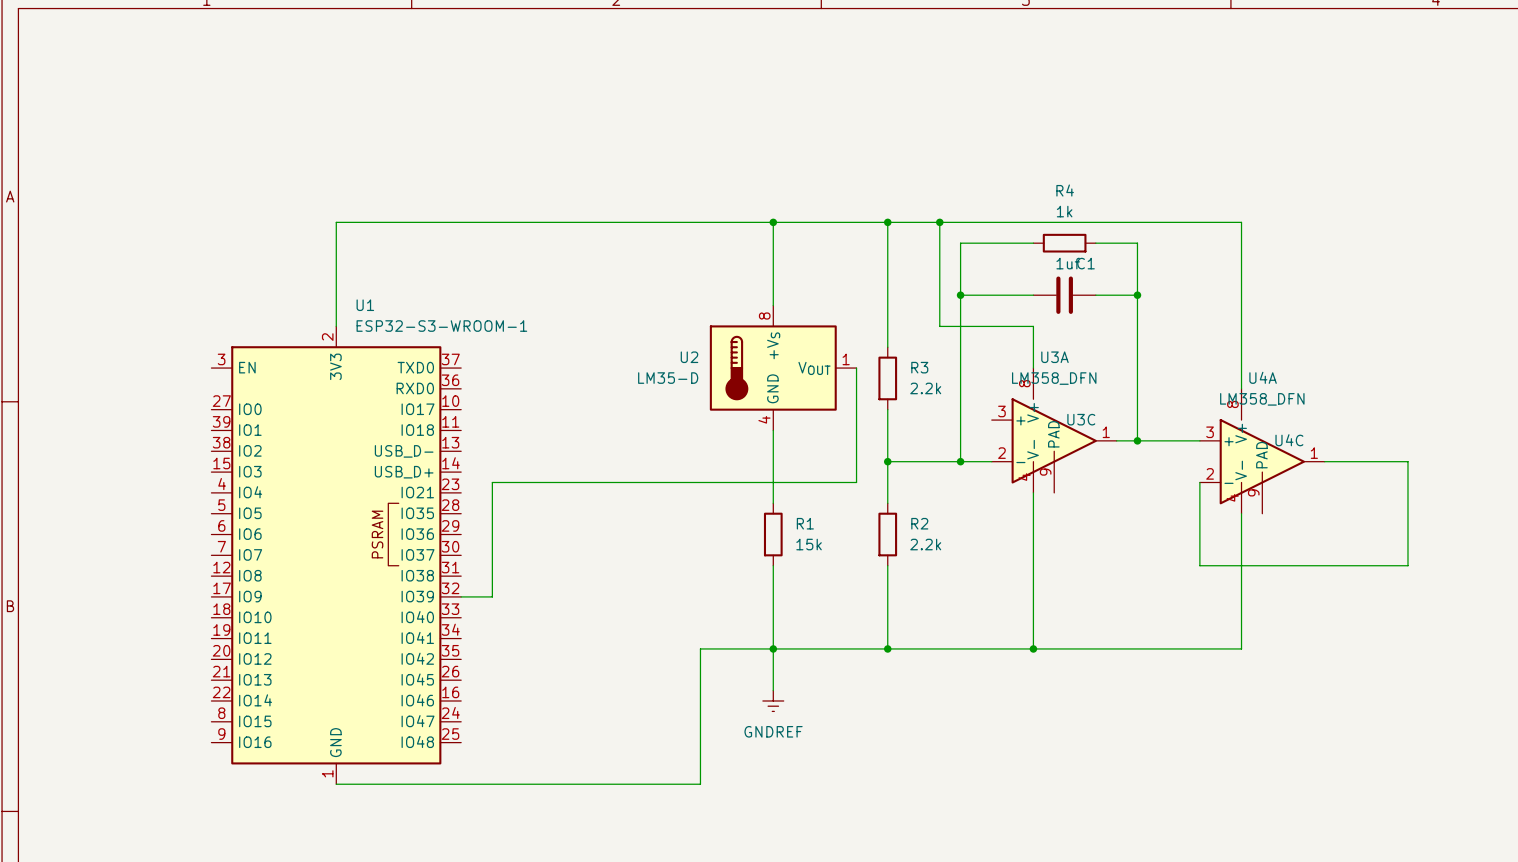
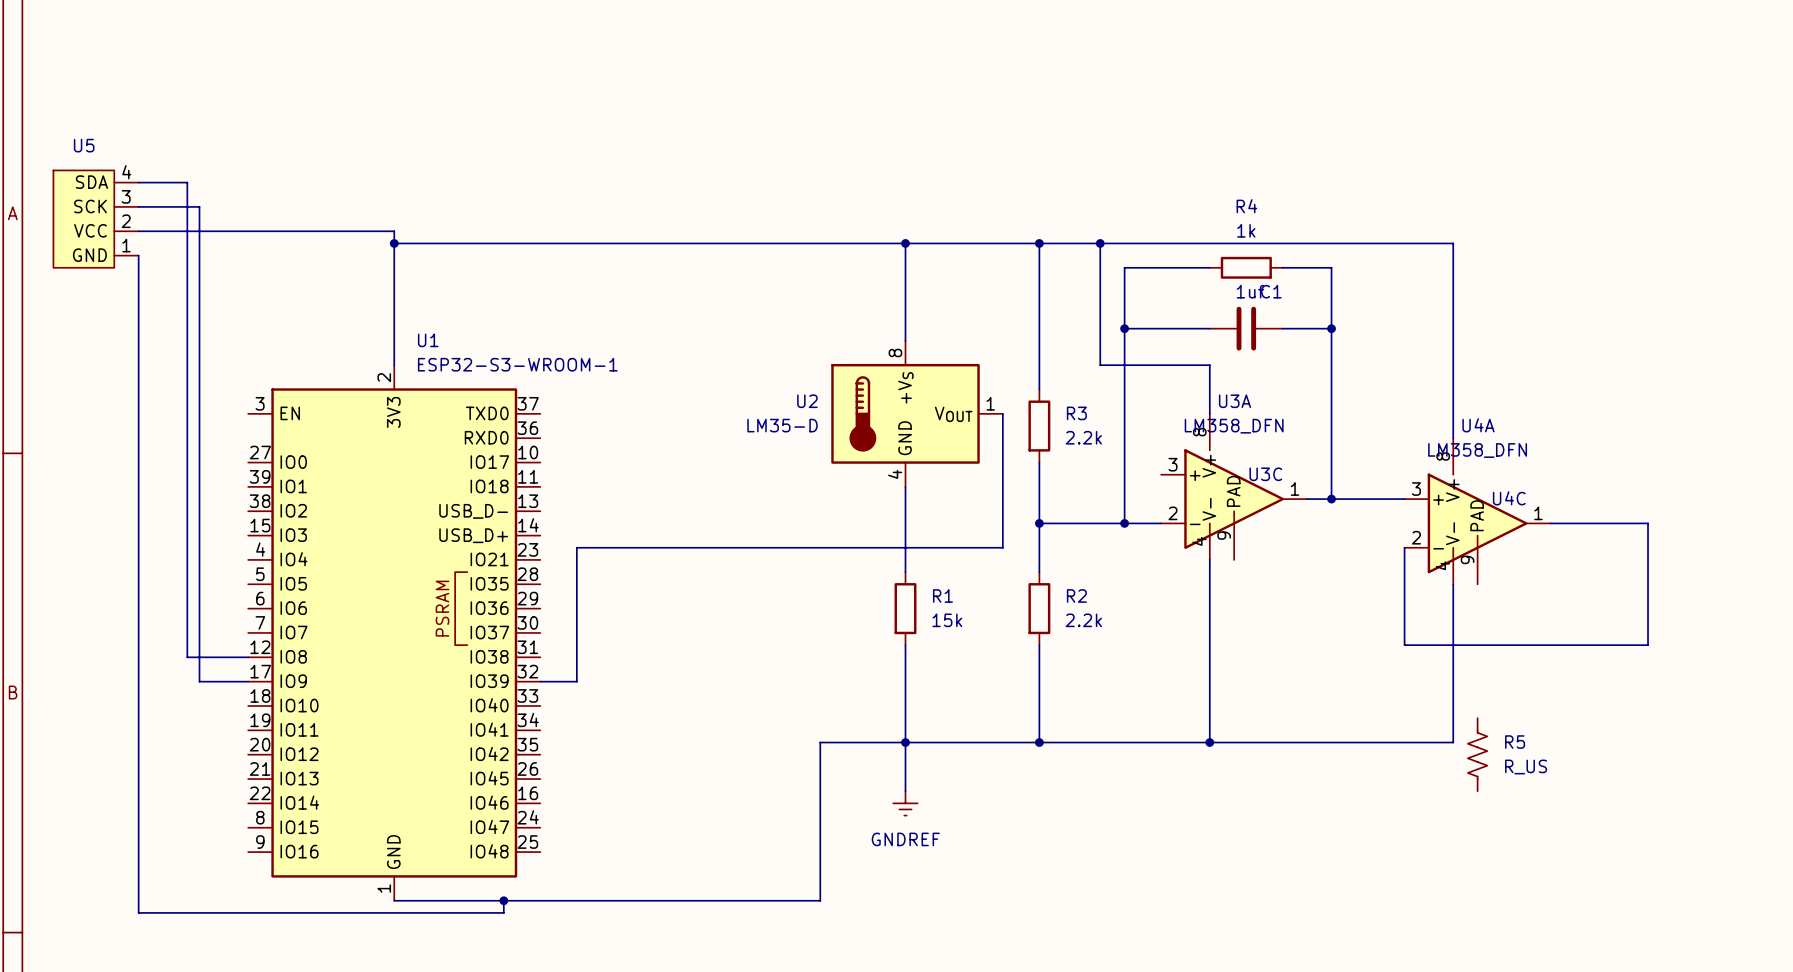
wire: none -> (138, 182) (187, 182) (187, 657) (248, 657)
wire: none -> (138, 206) (199, 206) (199, 681) (248, 681)
U5: none -> (96, 219)
wire: none -> (138, 231) (394, 231) (394, 243)
junction: none -> (394, 243)
wire: none -> (138, 255) (138, 912) (503, 912) (503, 900)
R5: none -> R_US (1477, 754)
junction: none -> (503, 900)

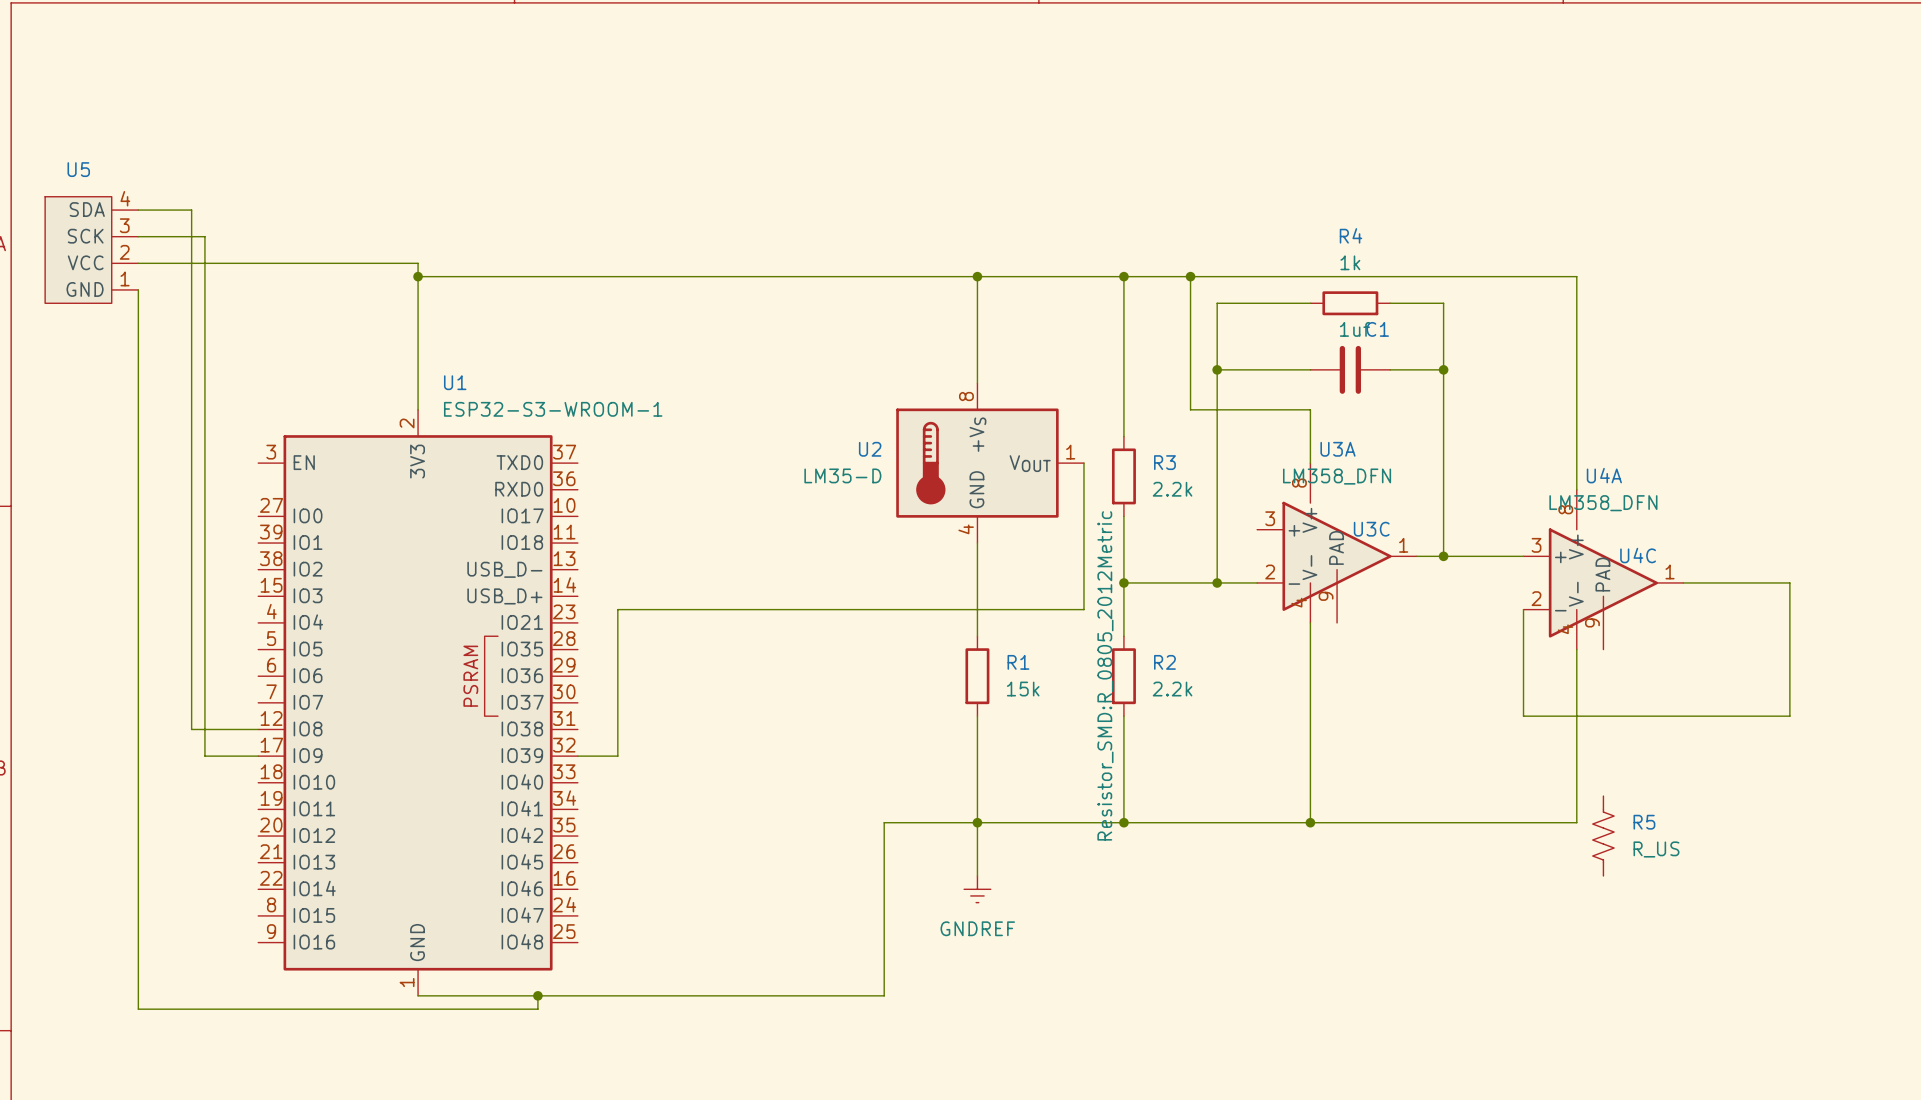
R2 text: none -> Resistor_SMD:R_0805_2012Metric (1105, 675)

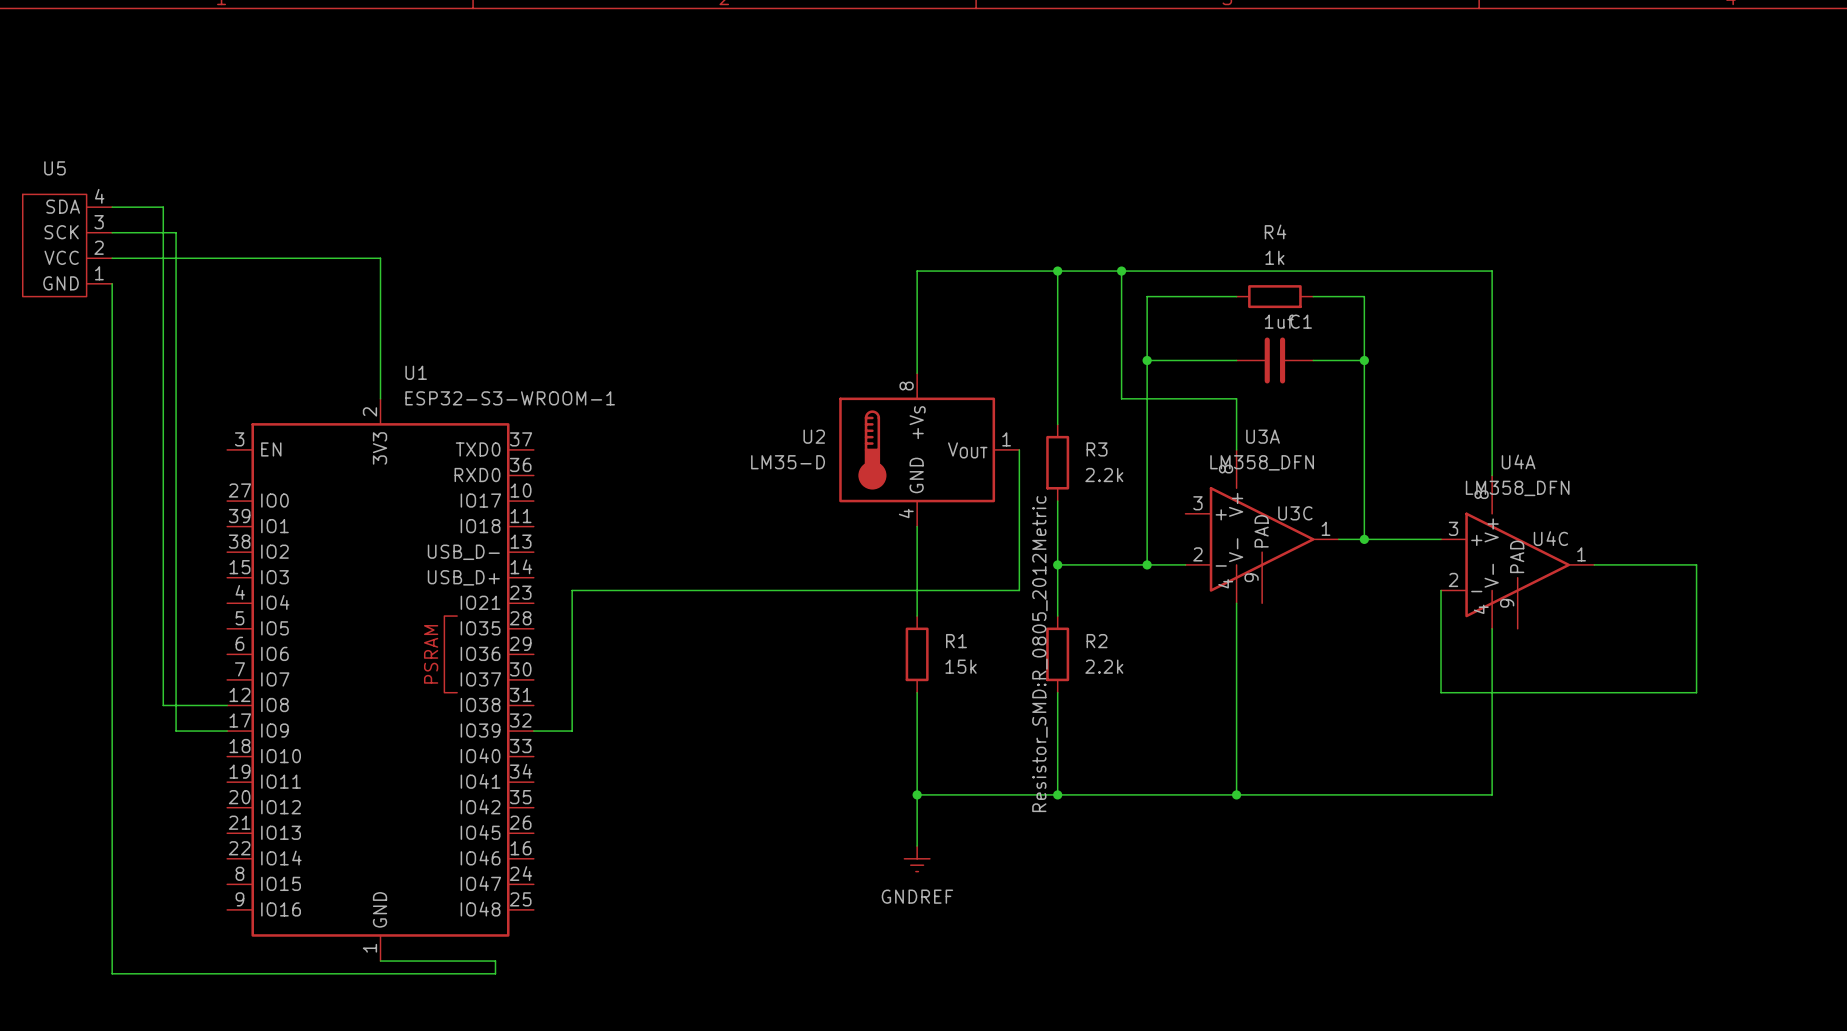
wire: (418, 276) (977, 276) -> none
junction: (418, 276) -> none
junction: (977, 276) -> none
wire: (977, 822) (884, 822) (884, 995) (537, 995) -> none
R5: R_US (1603, 836) -> none
junction: (537, 995) -> none

